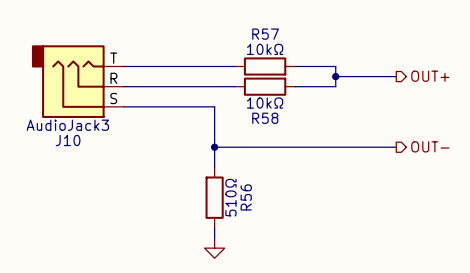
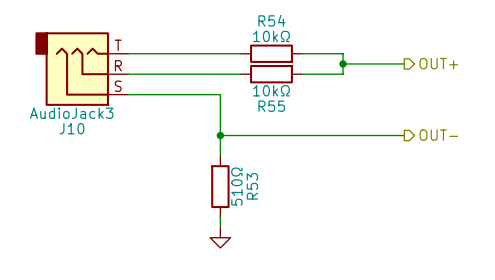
R57 name: R57 (265, 34) -> R54 (271, 20)
R58 name: R58 (265, 118) -> R55 (271, 106)
R56 name: R56 (246, 197) -> R53 (252, 186)

